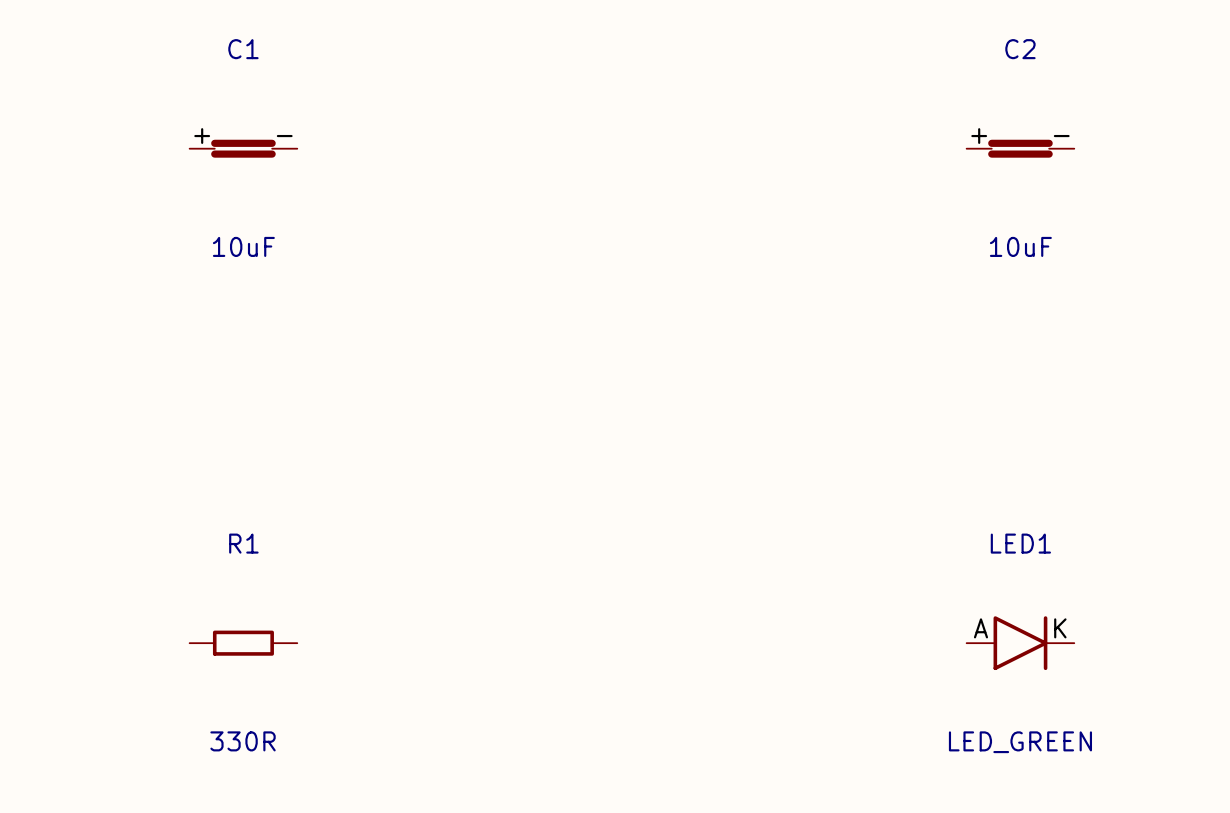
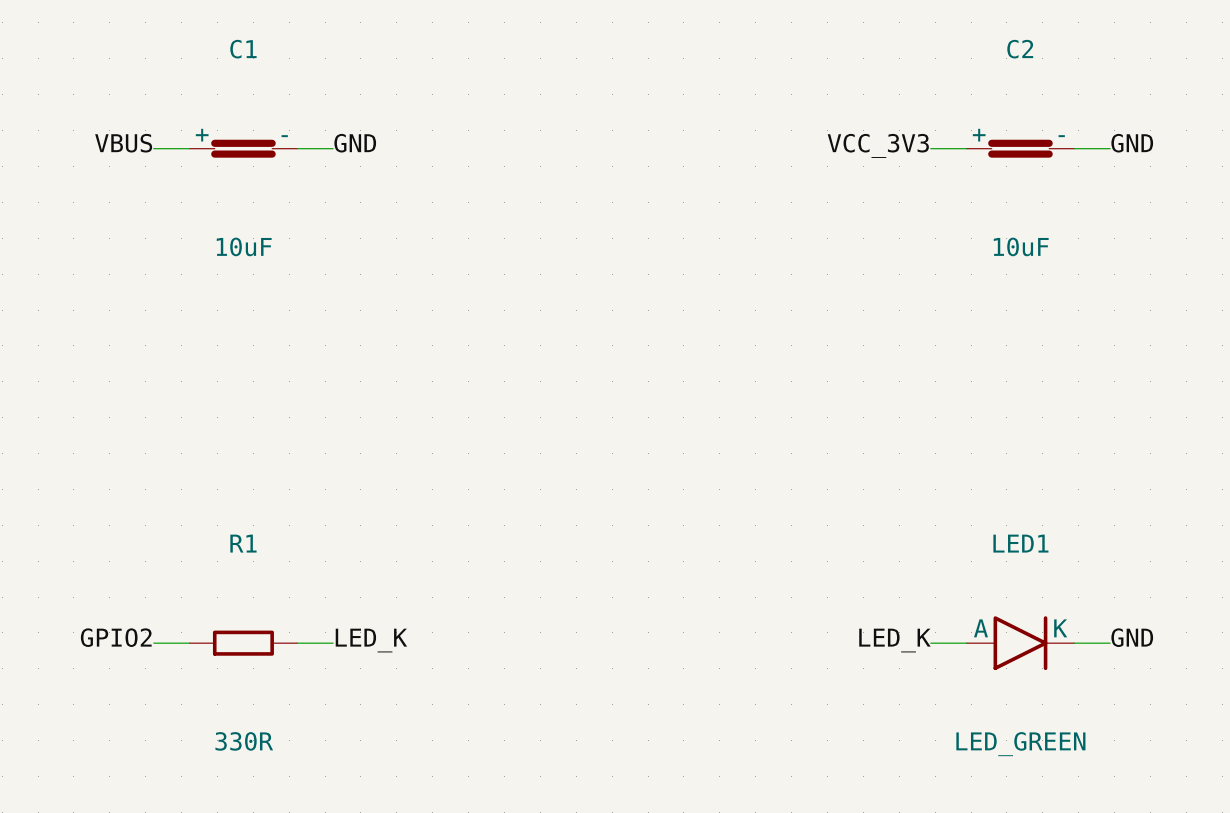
label: none -> VBUS (123, 143)
label: none -> GND (355, 143)
label: none -> GND (1132, 143)
label: none -> VCC_3V3 (878, 145)
wire: none -> (153, 148) (189, 148)
wire: none -> (297, 148) (333, 148)
wire: none -> (930, 148) (966, 148)
wire: none -> (1074, 148) (1110, 148)
label: none -> GPIO2 (116, 637)
label: none -> GND (1132, 637)
label: none -> LED_K (371, 640)
label: none -> LED_K (894, 640)
wire: none -> (153, 643) (189, 643)
wire: none -> (297, 643) (333, 643)
wire: none -> (930, 643) (966, 643)
wire: none -> (1074, 643) (1110, 643)

